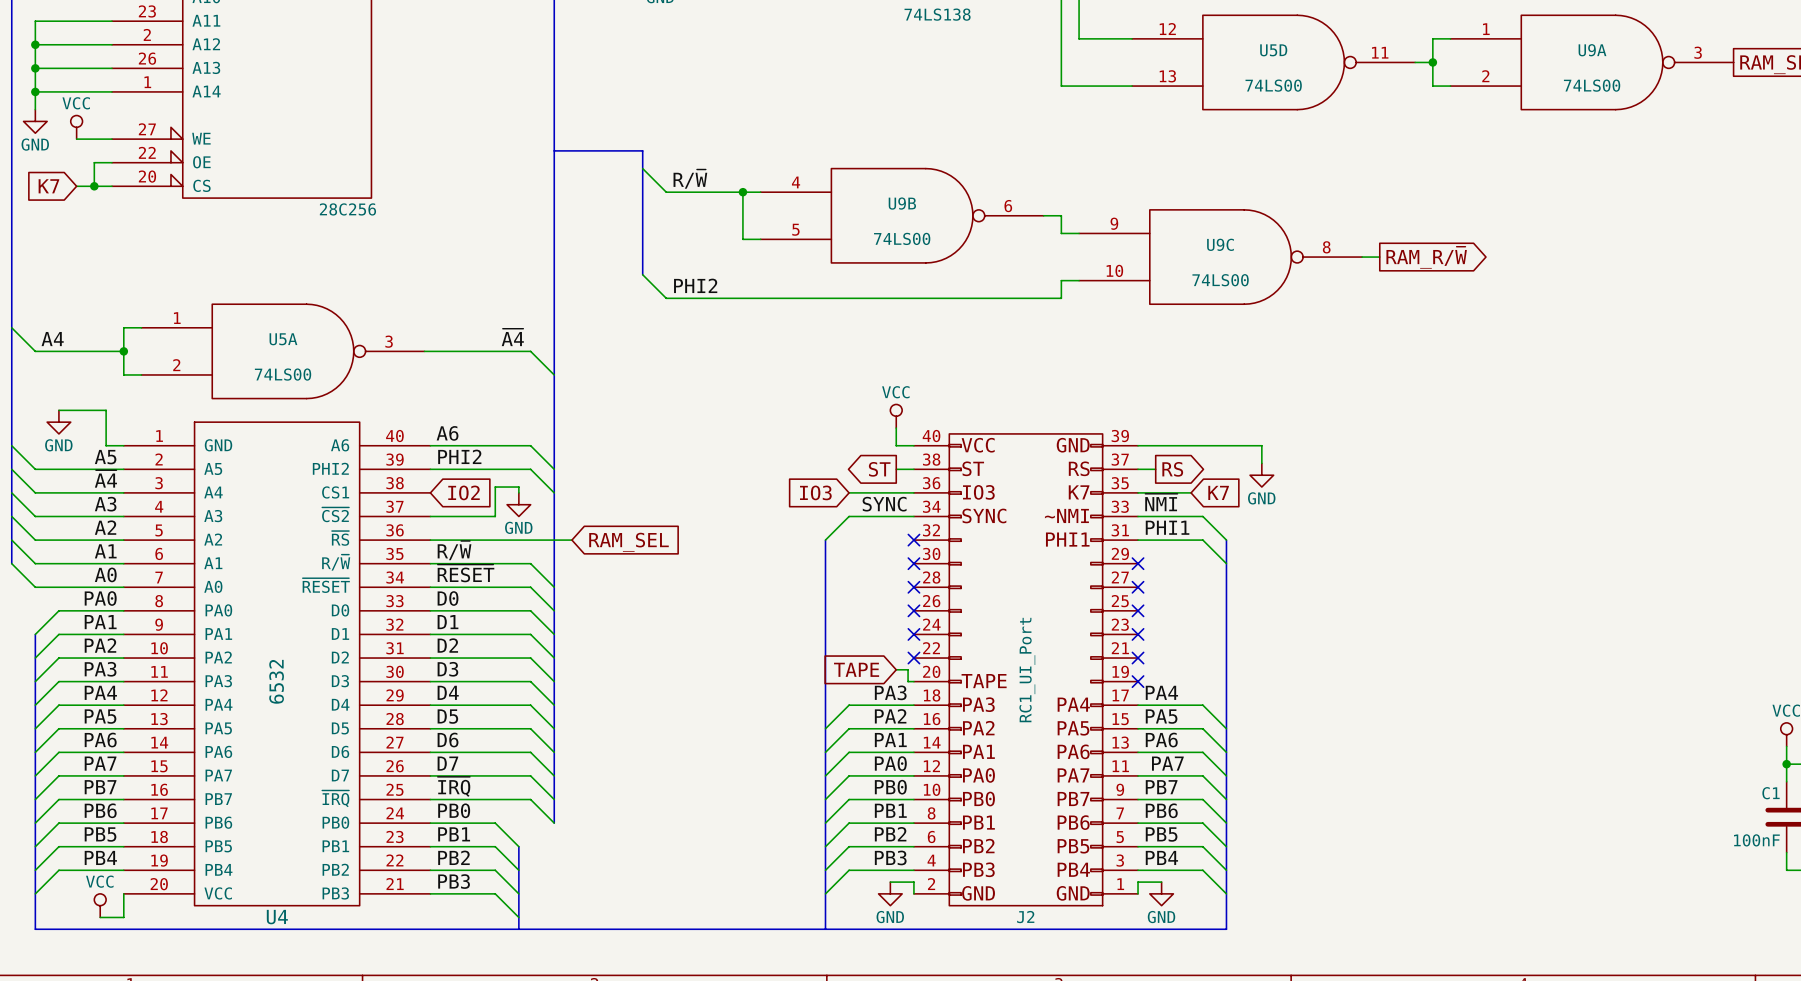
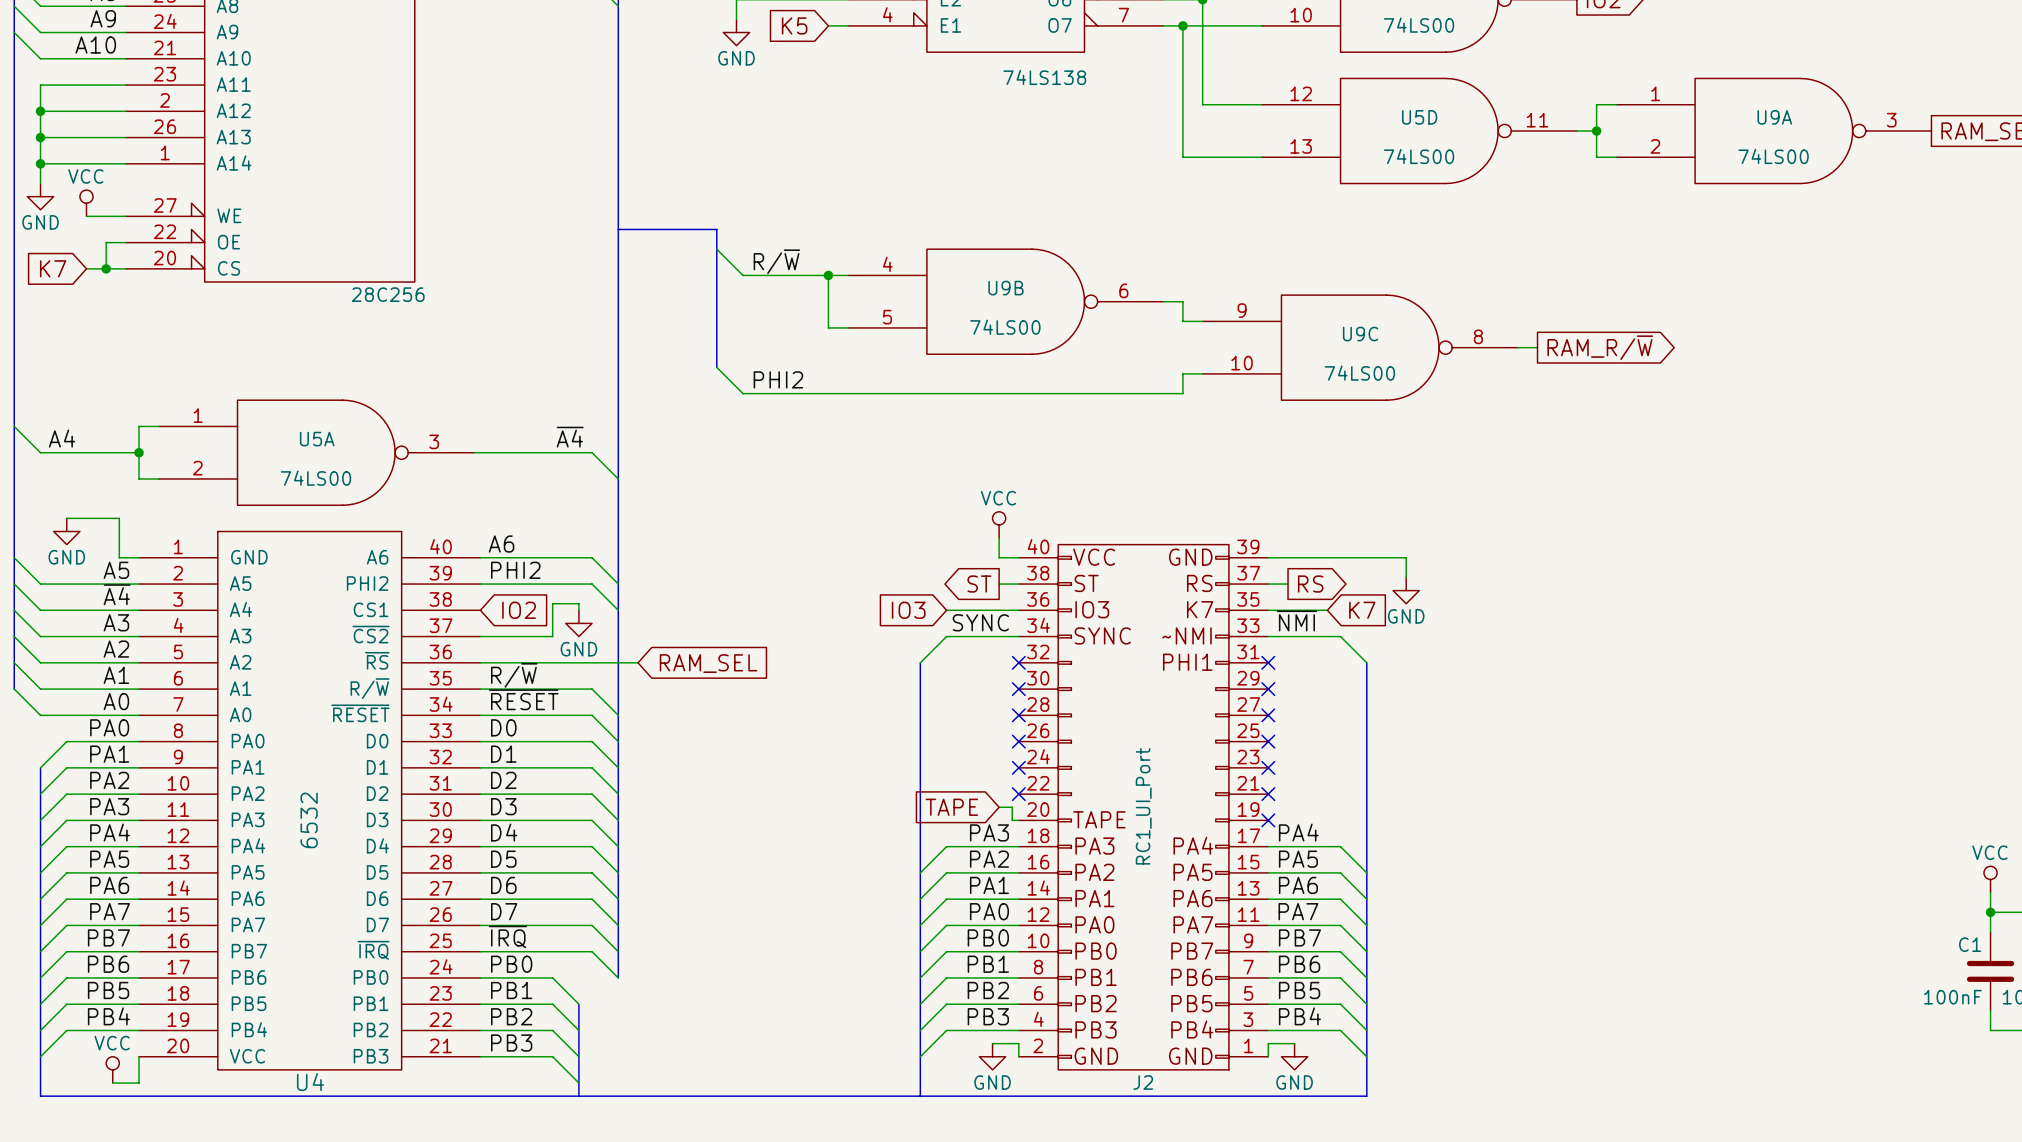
label: PHI1 (1167, 527) -> none
wire: (1138, 540) (1202, 540) (1226, 563) -> none
no-connect mark: none -> (1268, 662)

